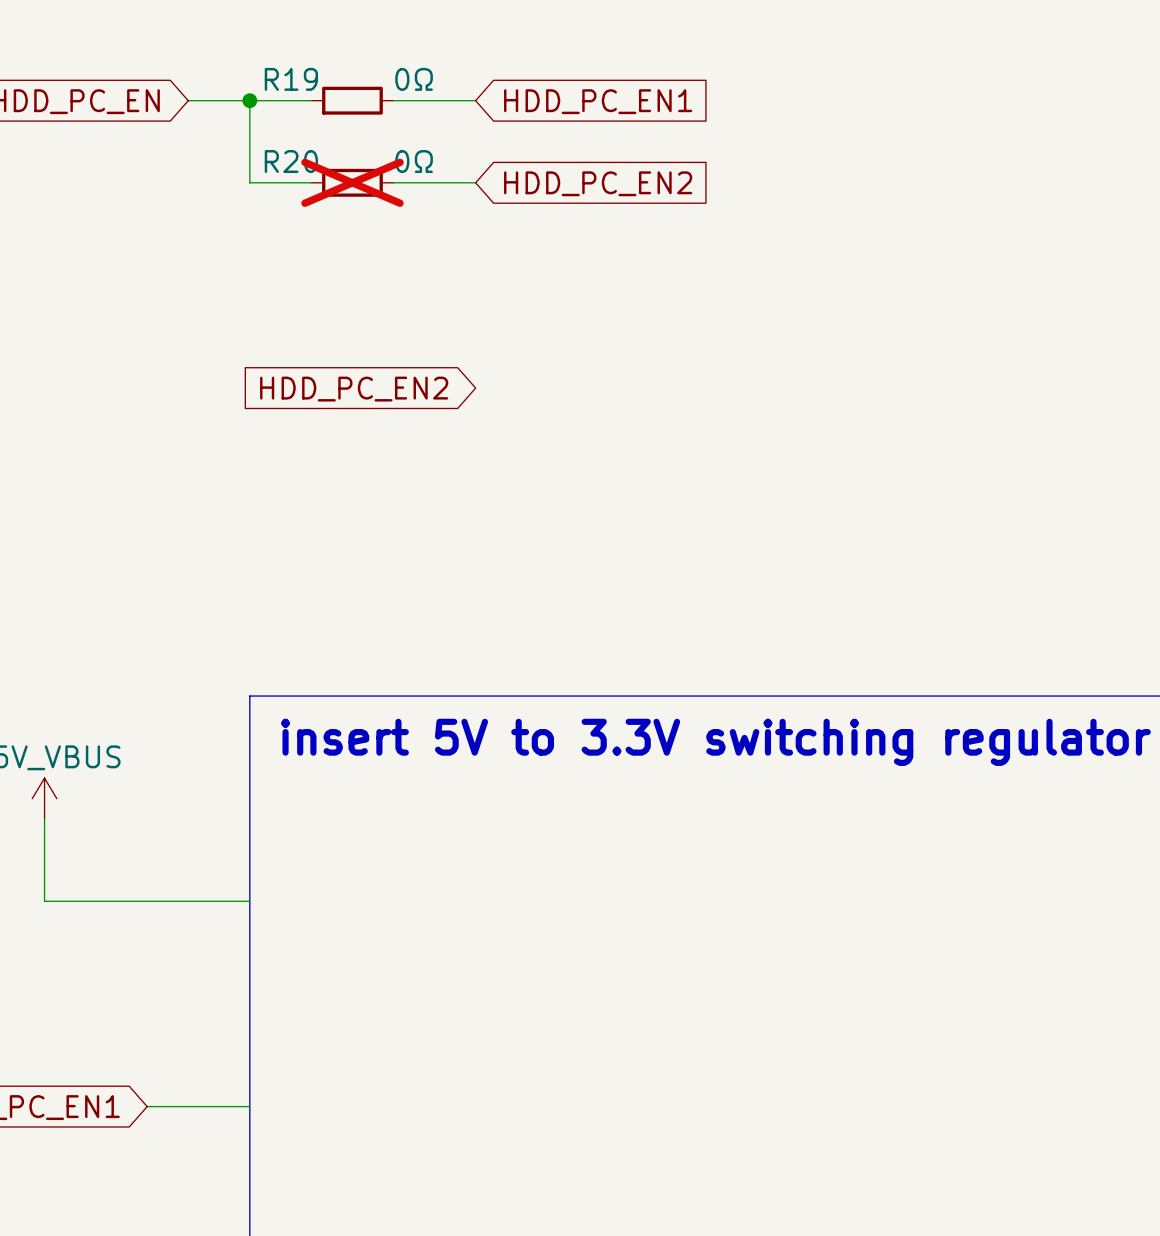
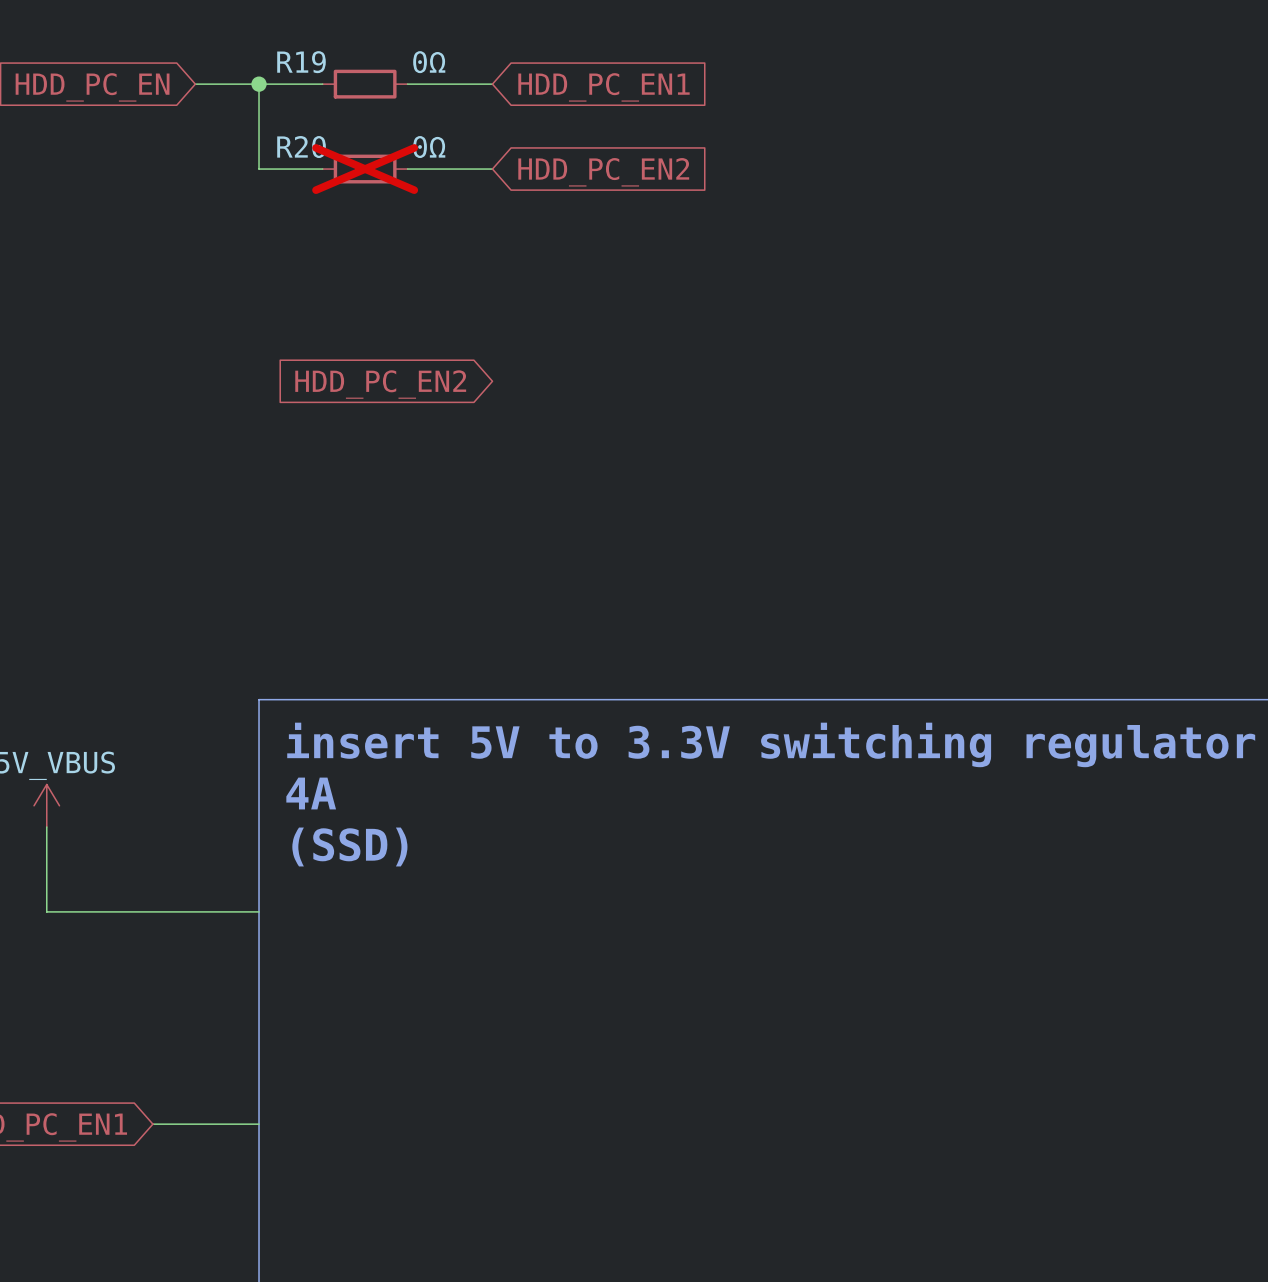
text: none -> 4A (311, 793)
text: none -> (SSD) (349, 847)

